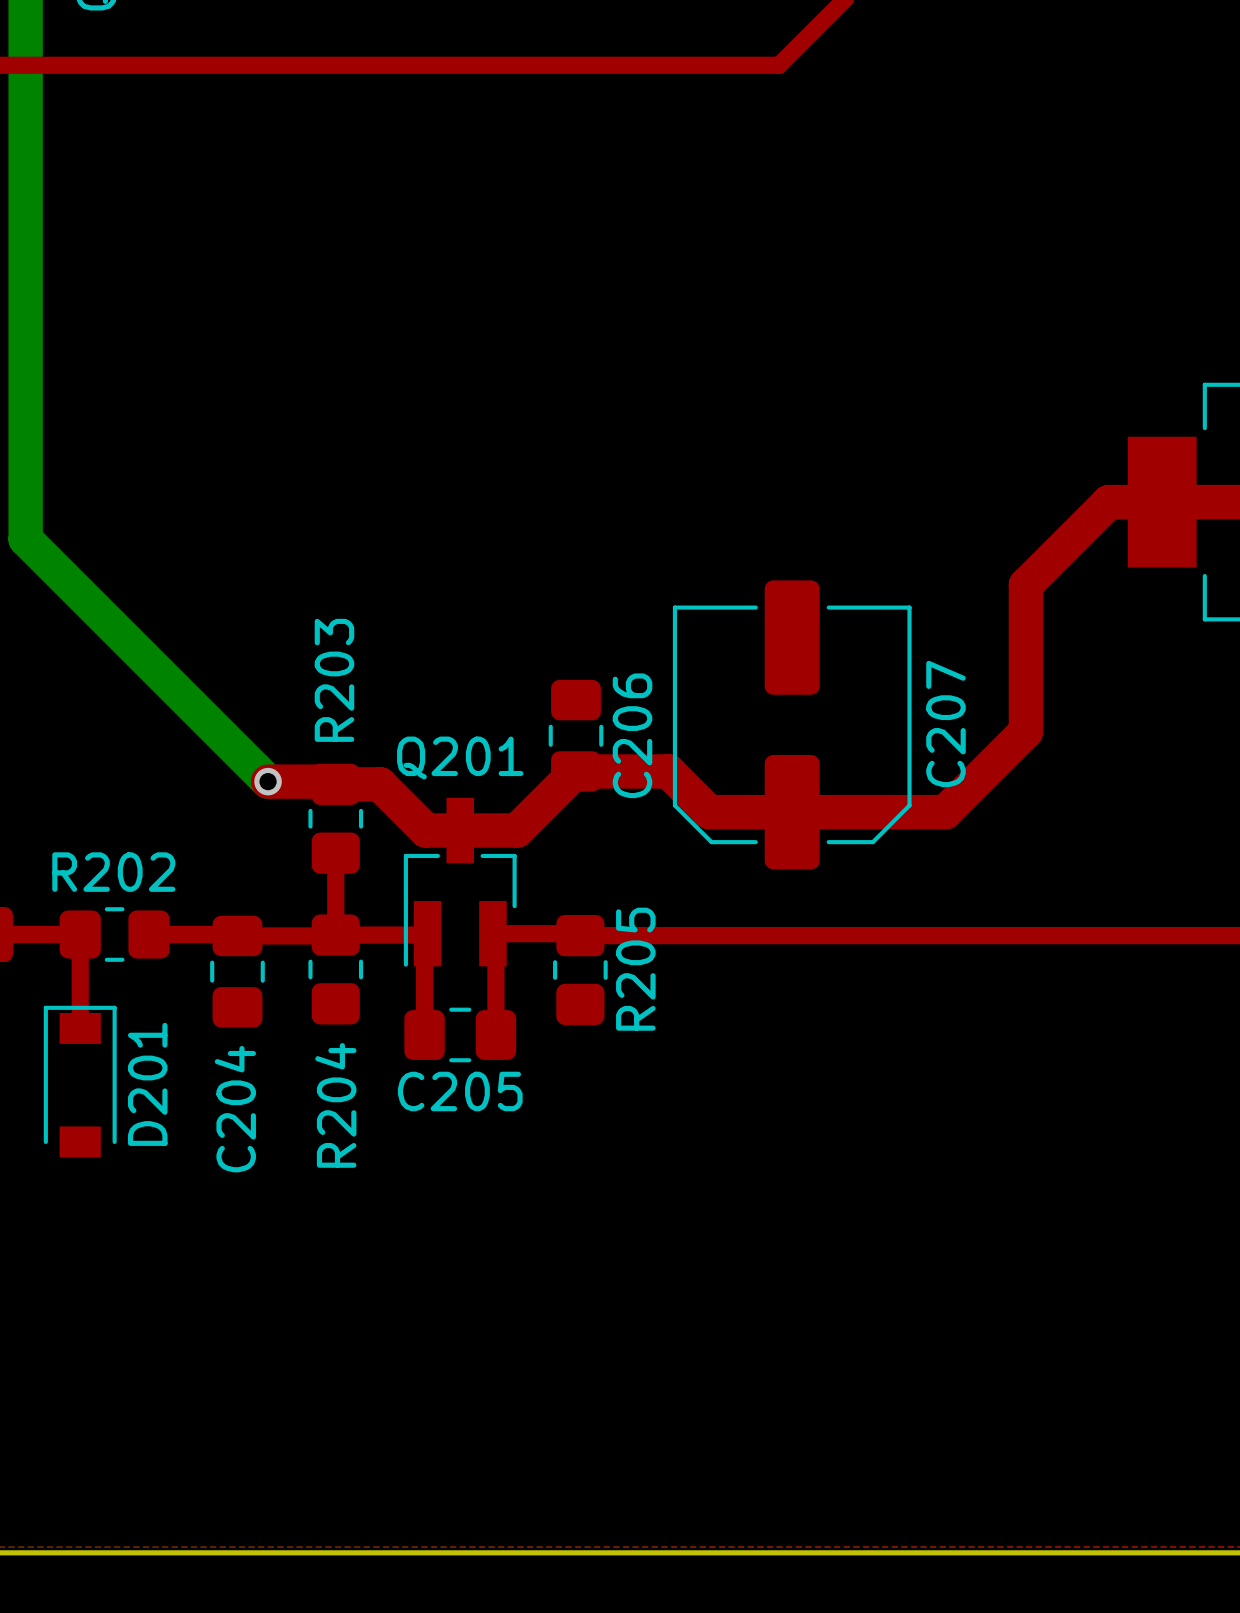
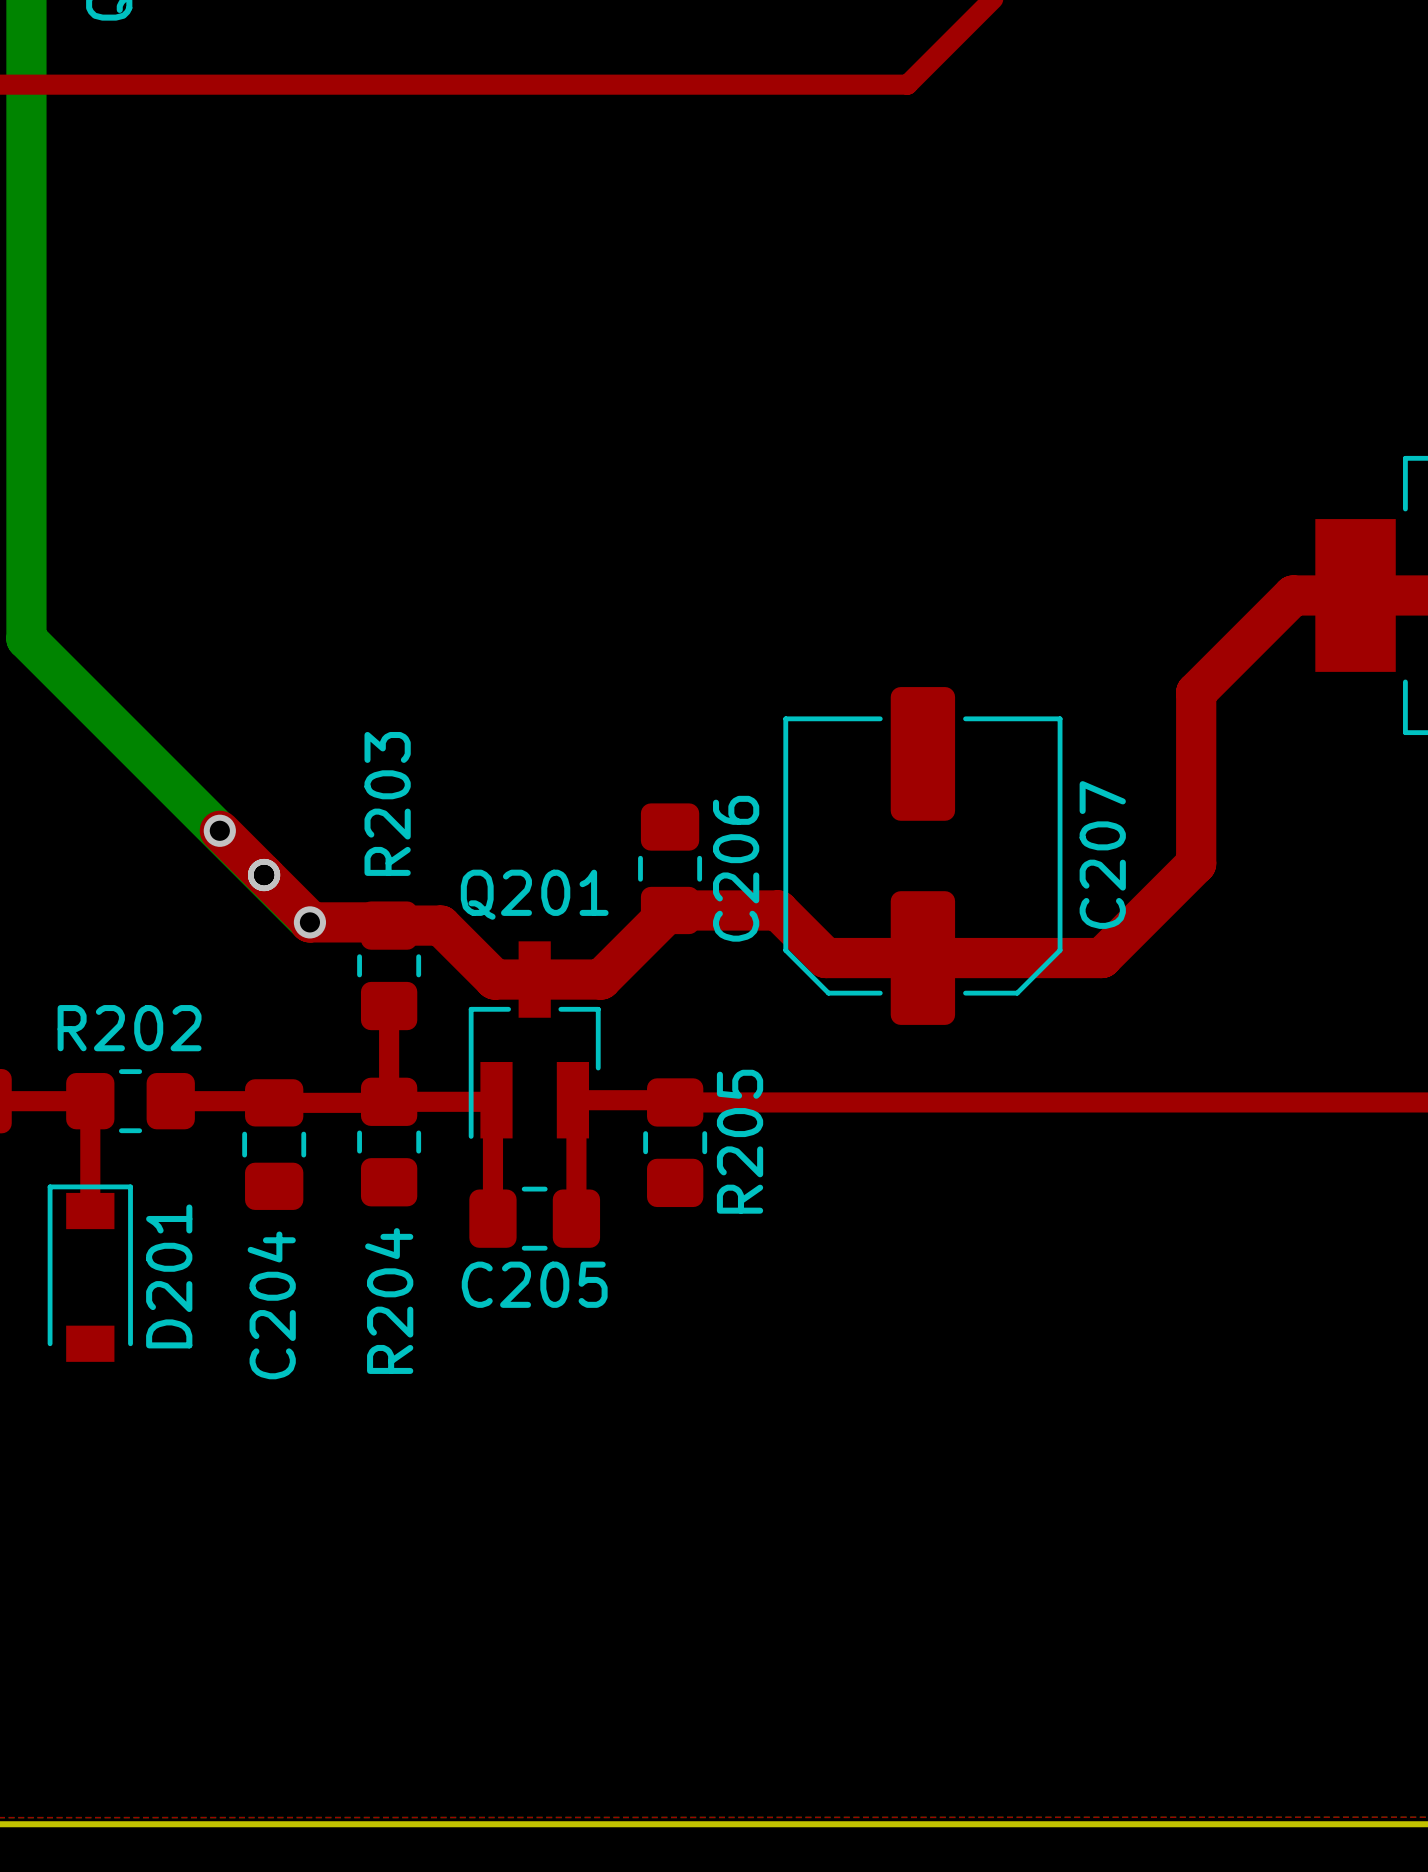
top track: none -> (219, 830) (309, 922)
via: none -> (219, 830)
via: none -> (264, 875)

